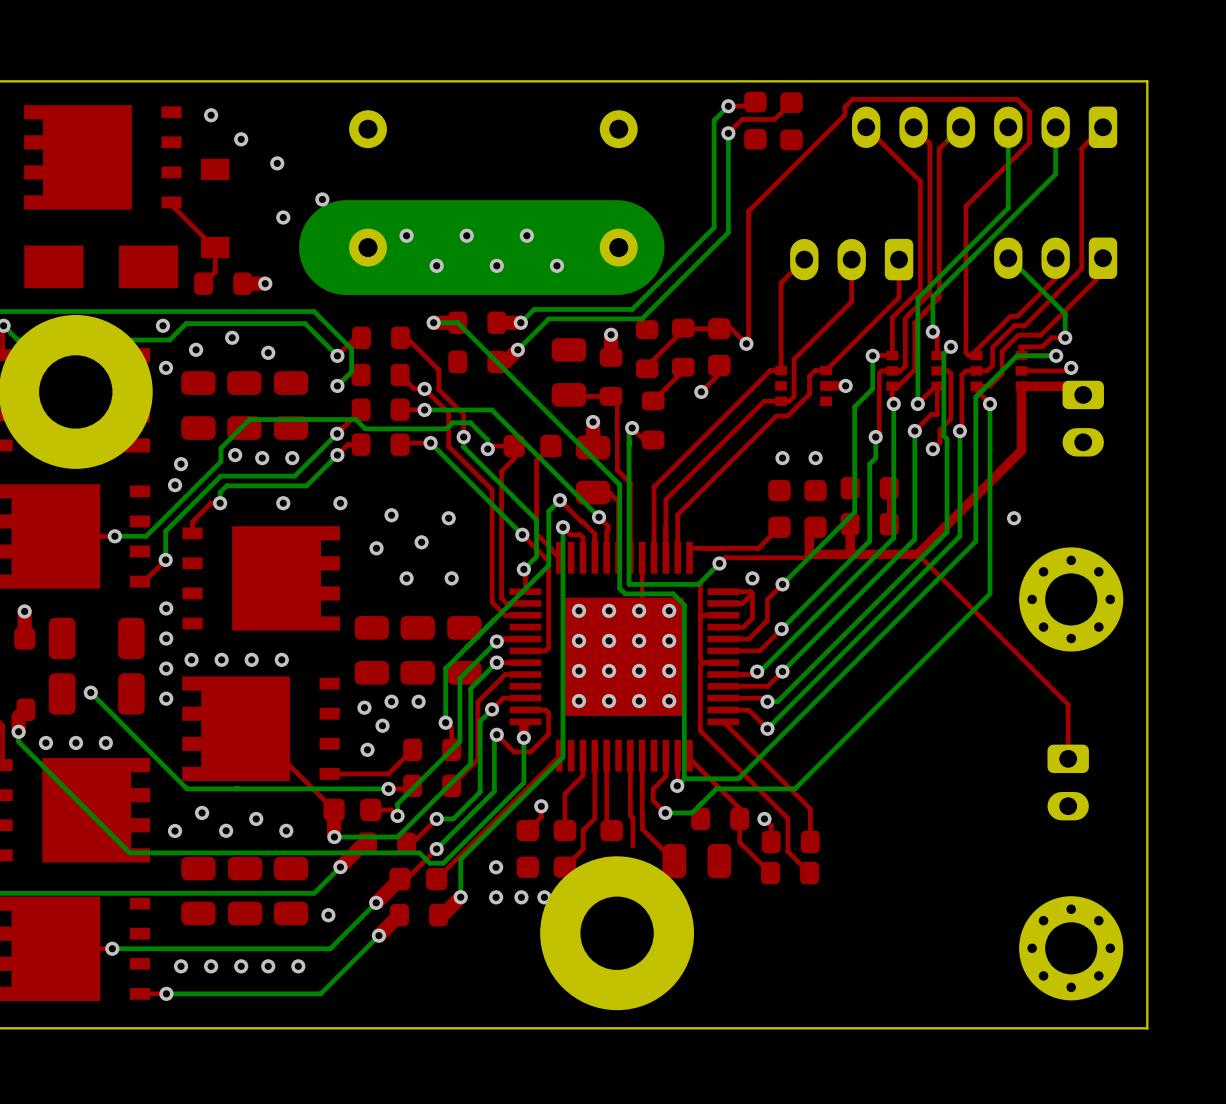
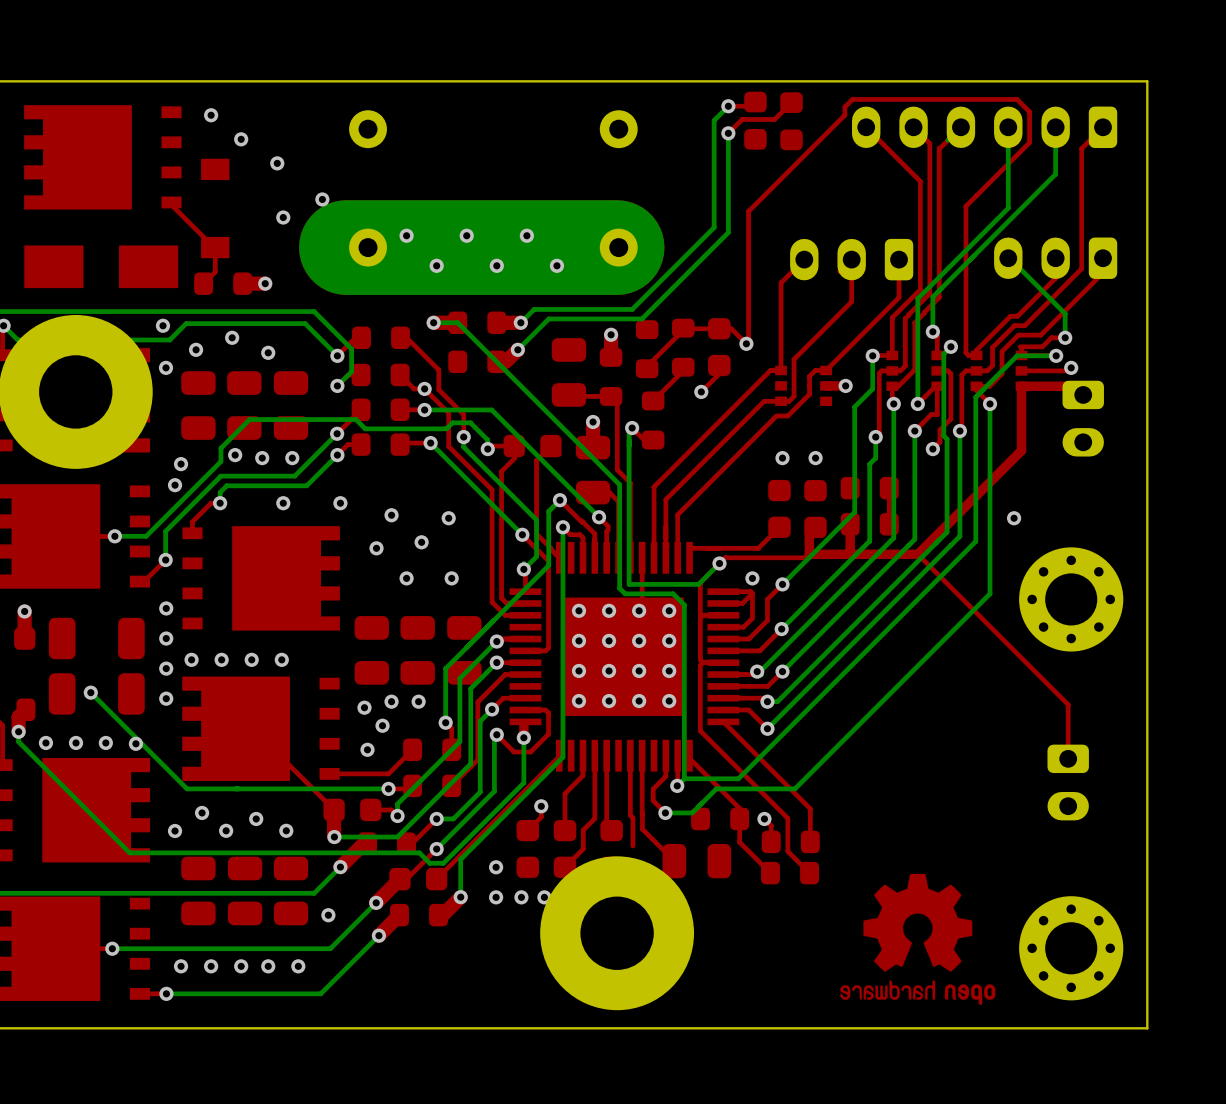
via: none -> (135, 743)
drawing: none -> [840, 873, 996, 1006]

